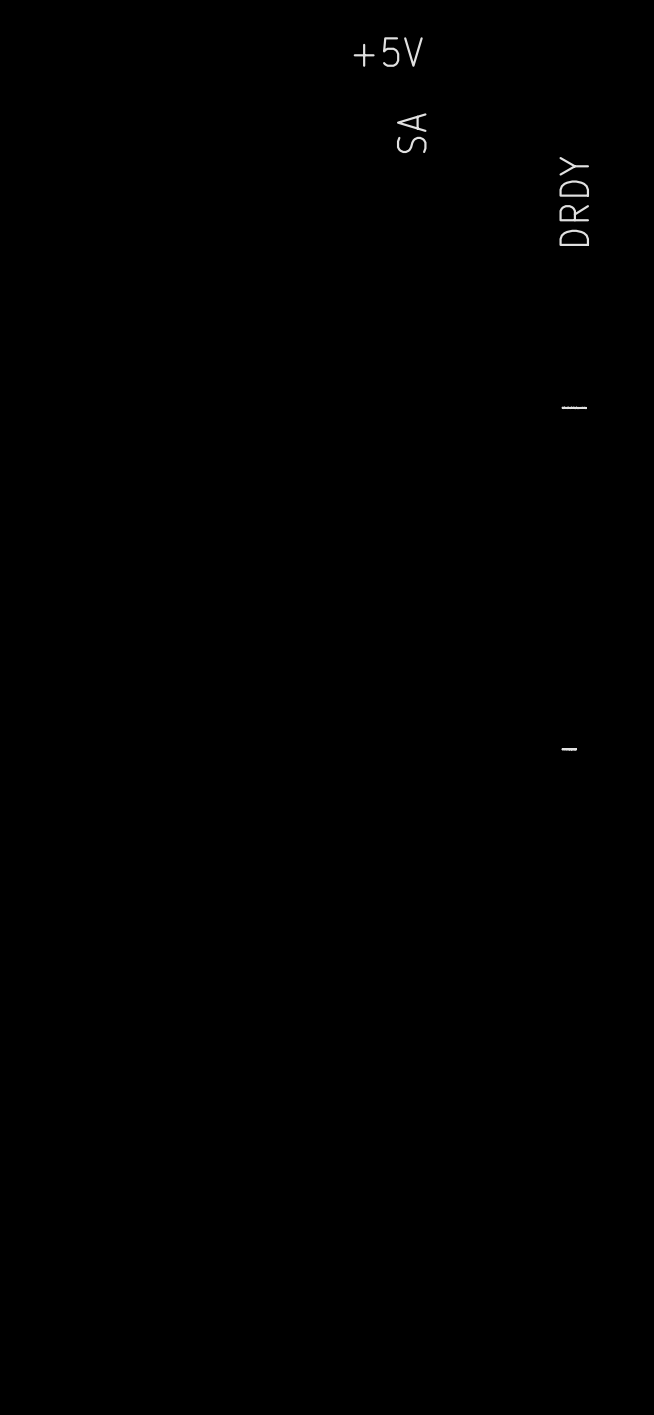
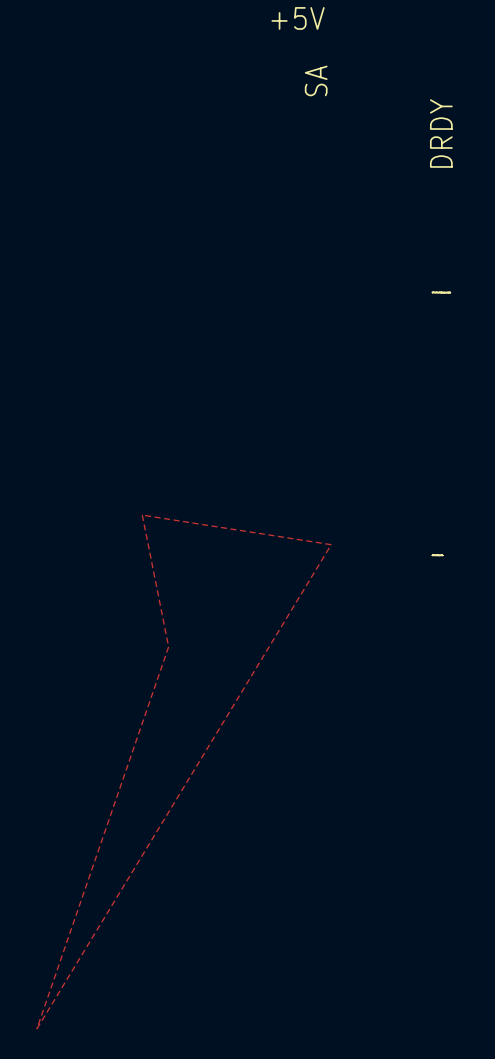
zone outline: none -> (142, 515) (168, 646) (36, 1028) (331, 544) (142, 515)

